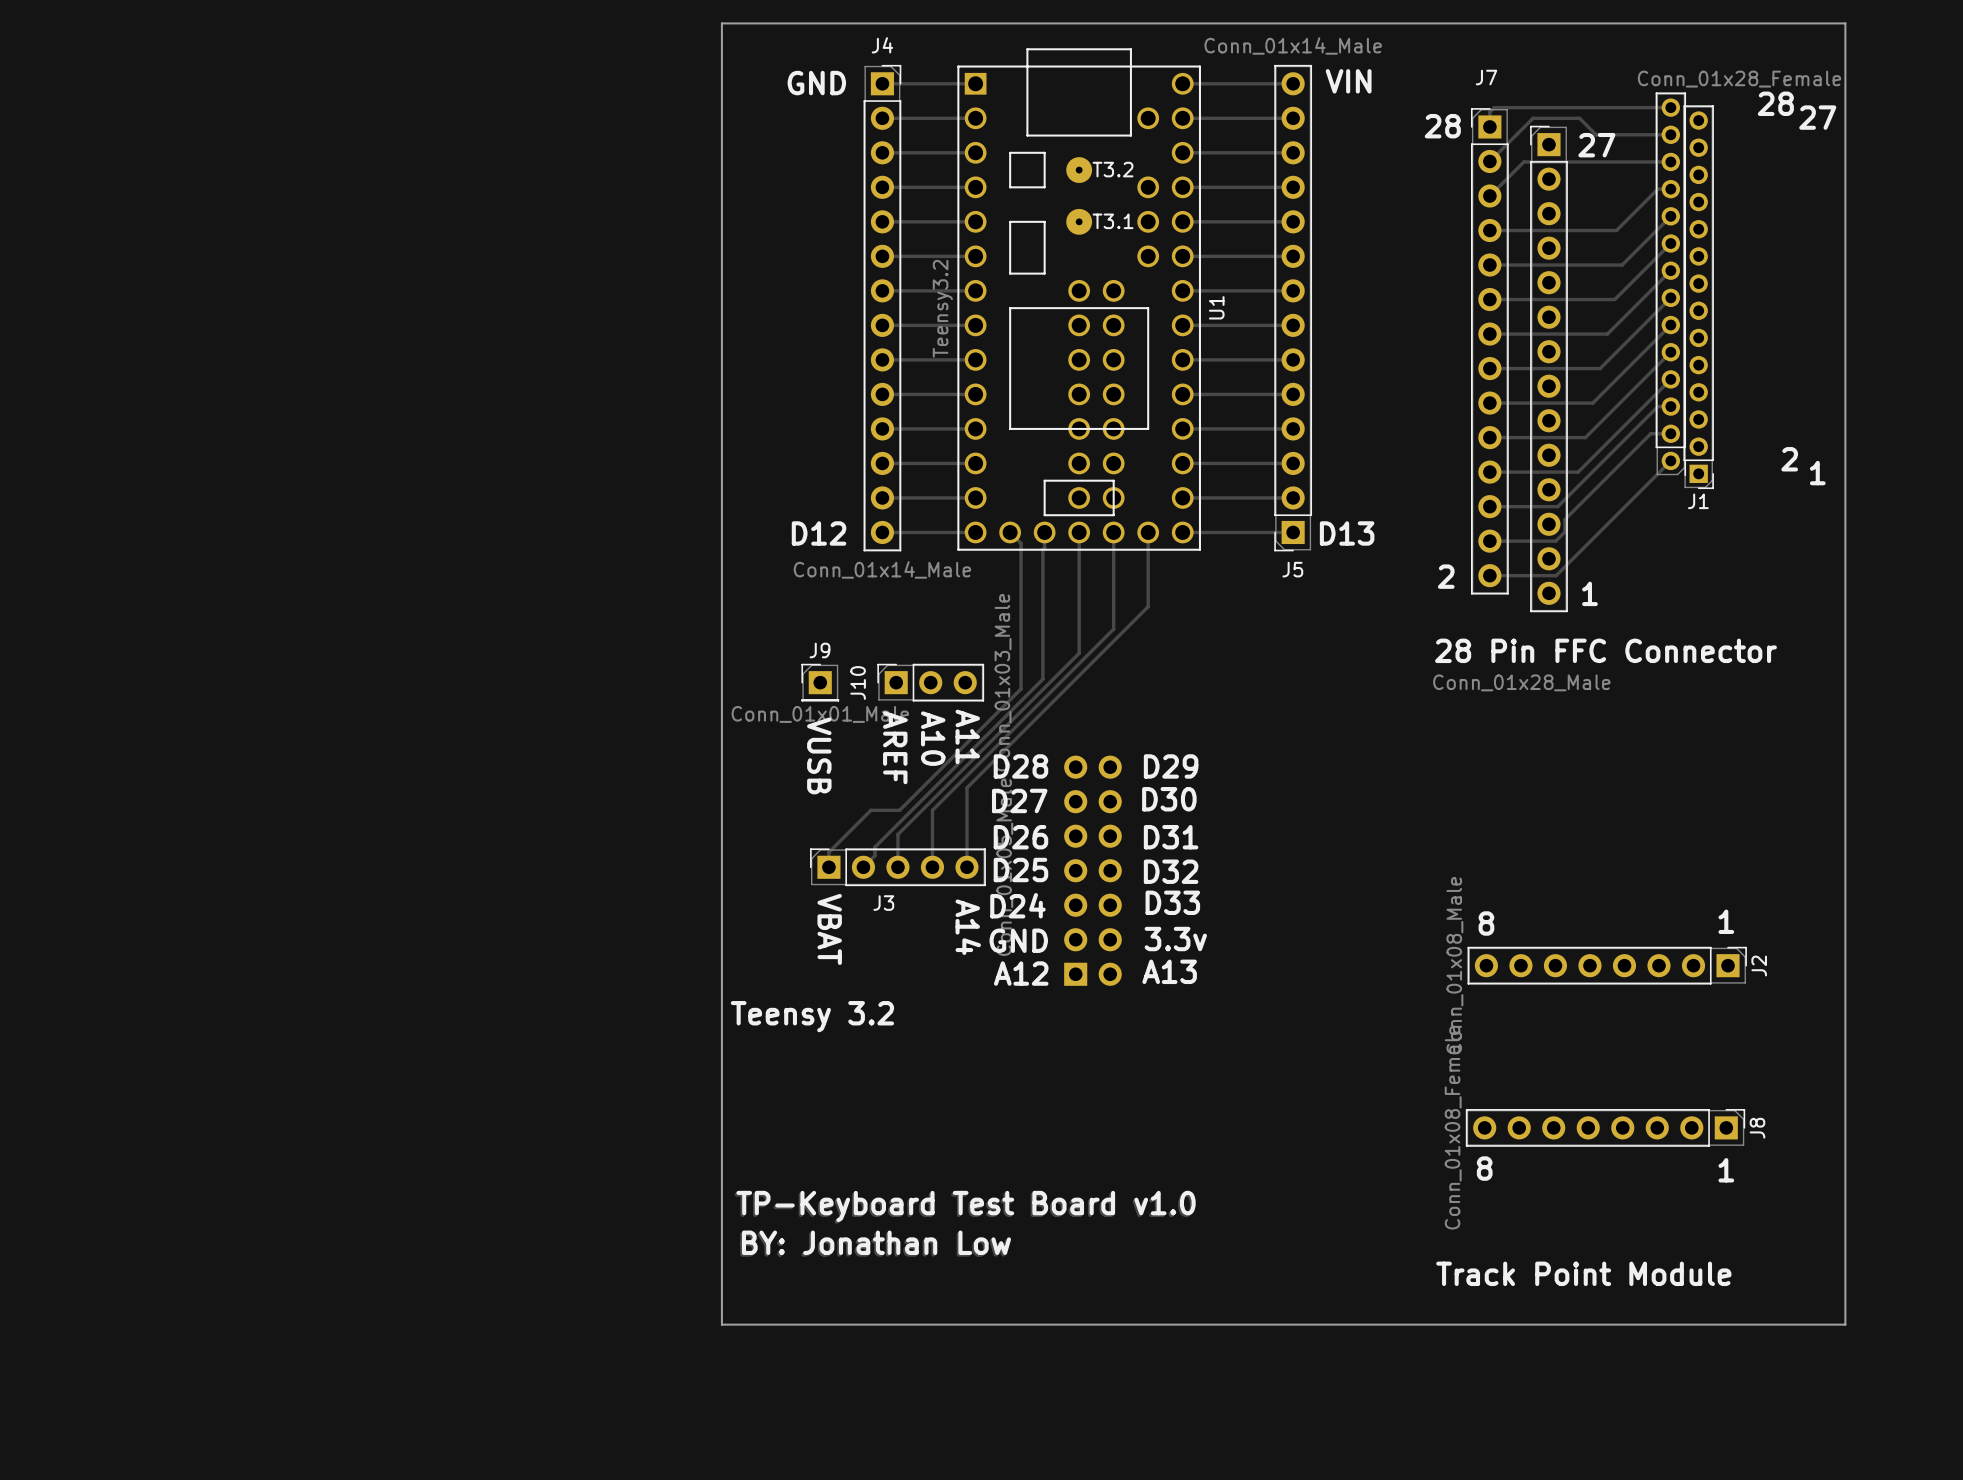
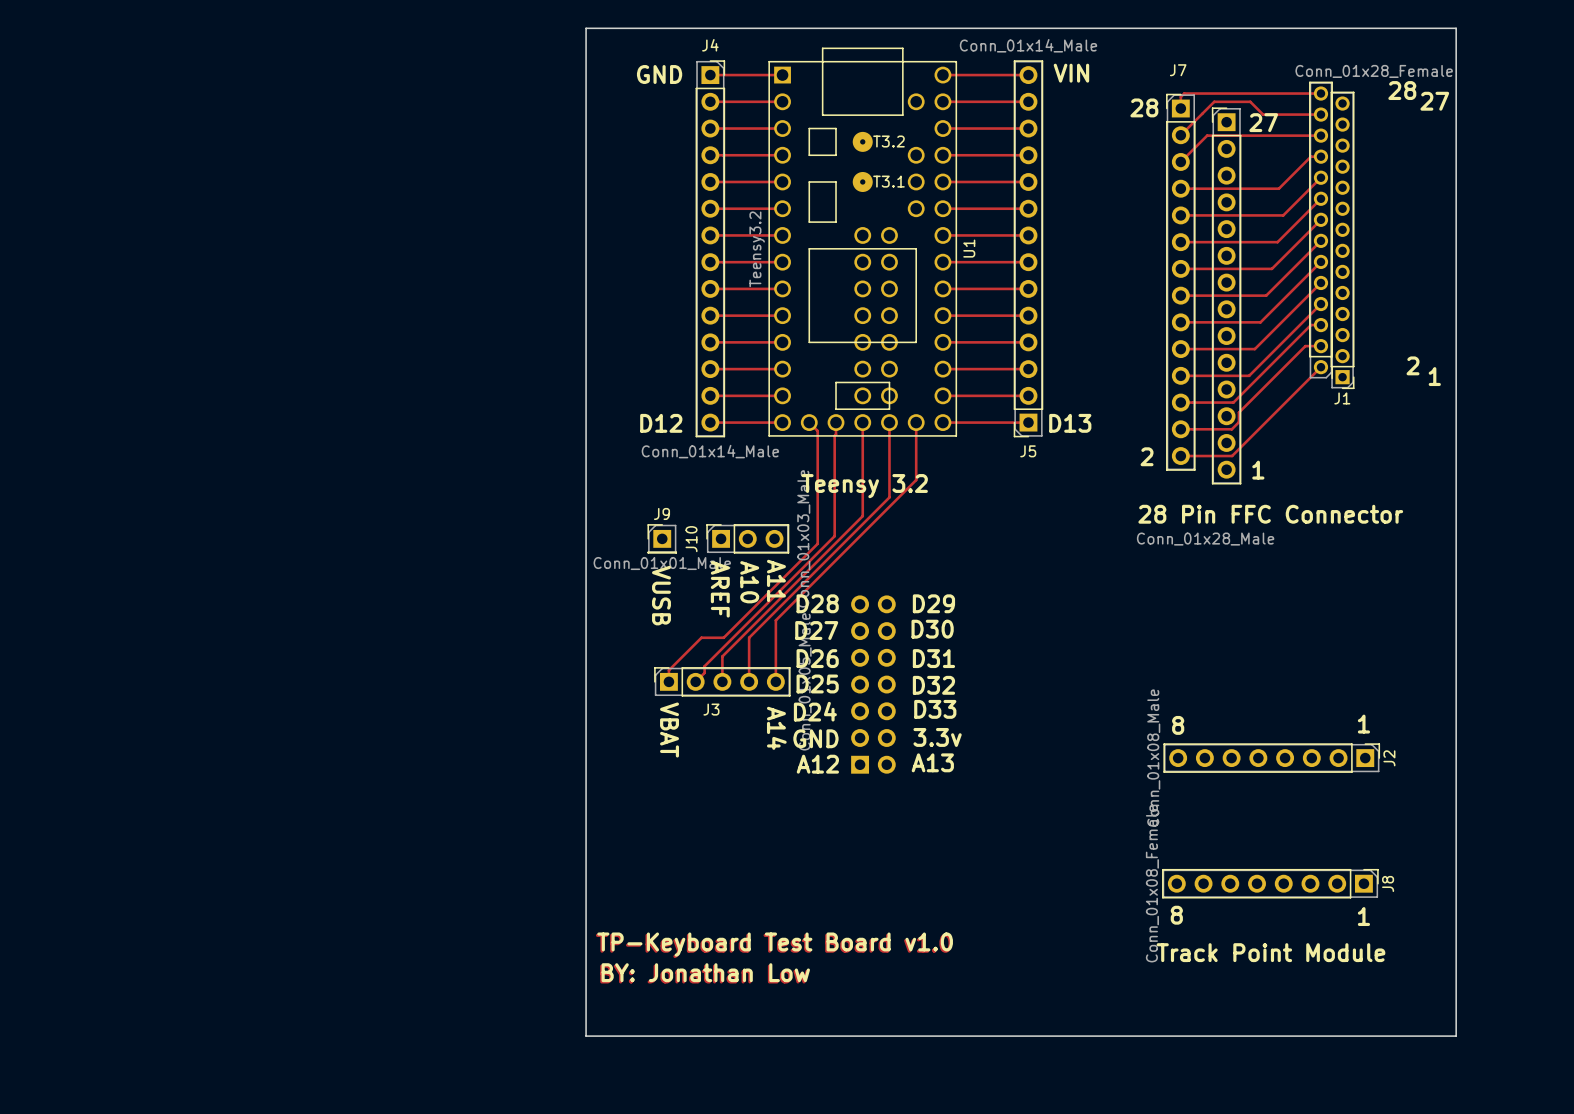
text: none -> Teensy 3.2 (864, 486)
text: Teensy 3.2 (812, 1016) -> none
text position: Track Point Module (1583, 1273) -> Track Point Module (1270, 952)

